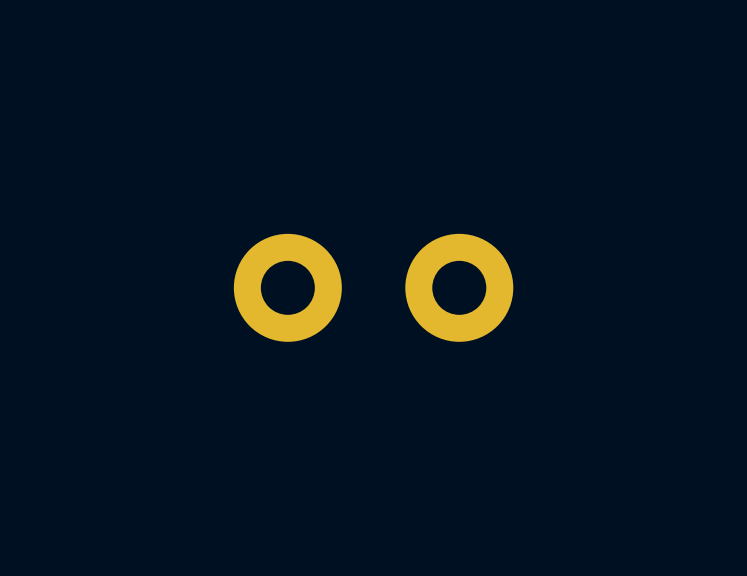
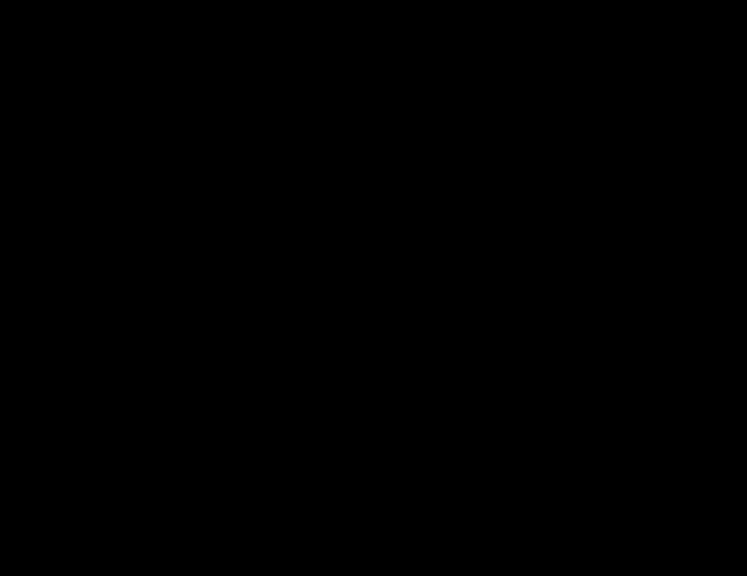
part: (373, 287) -> none

